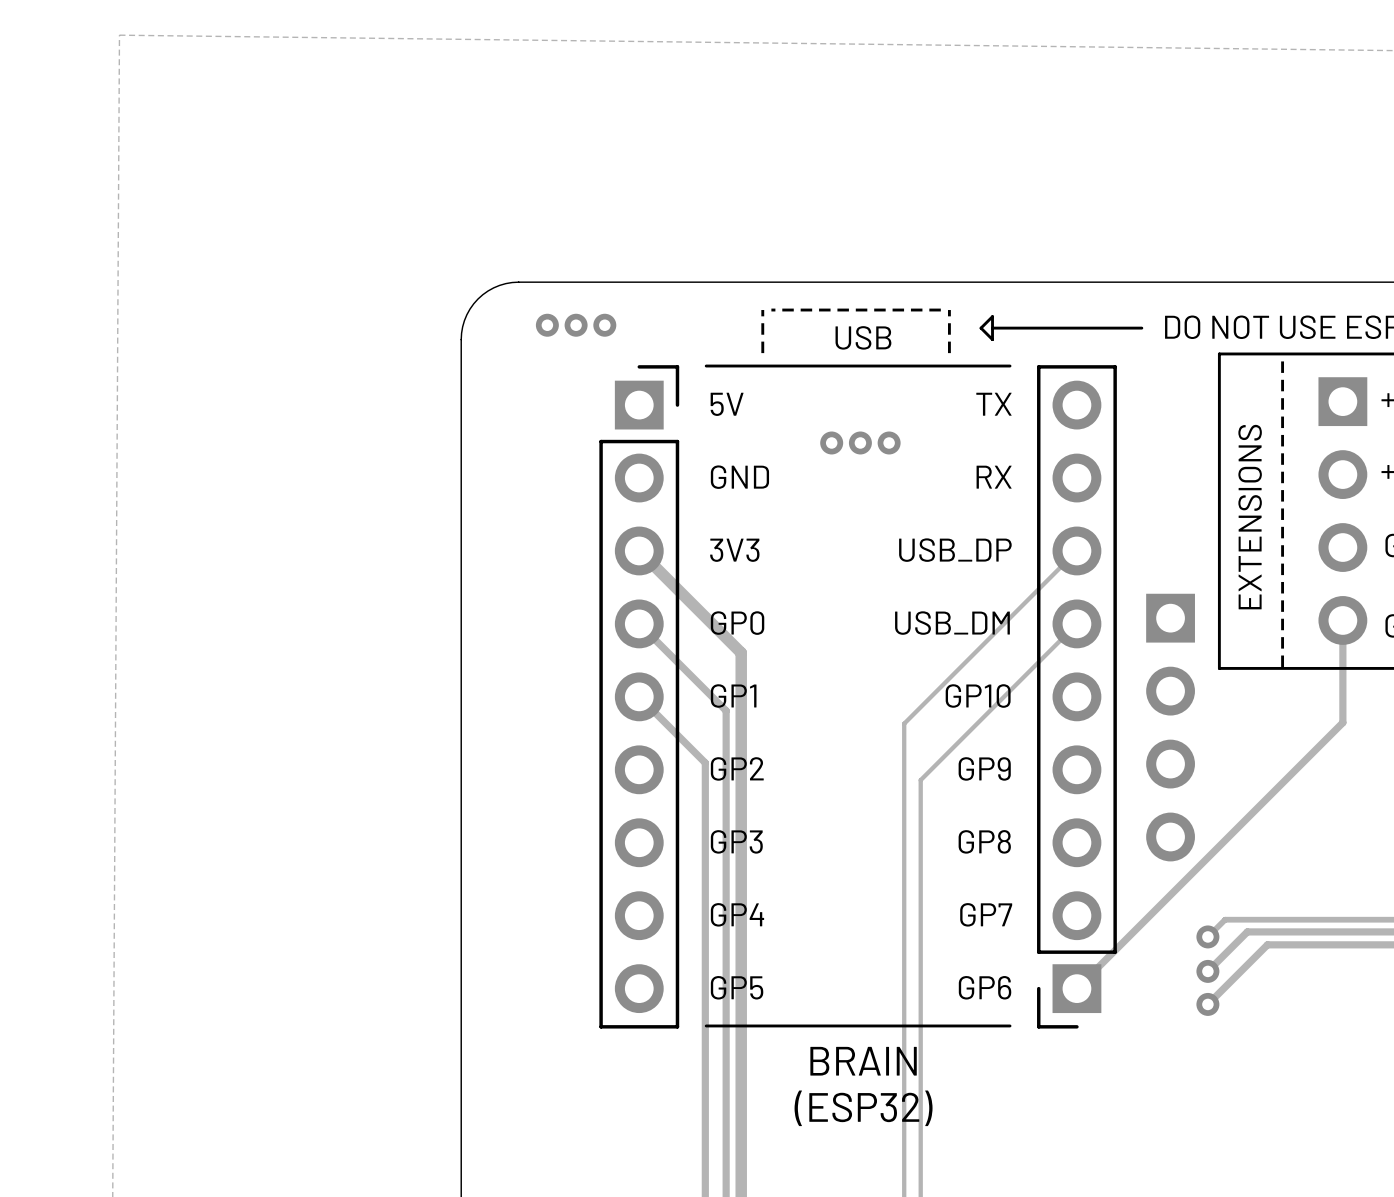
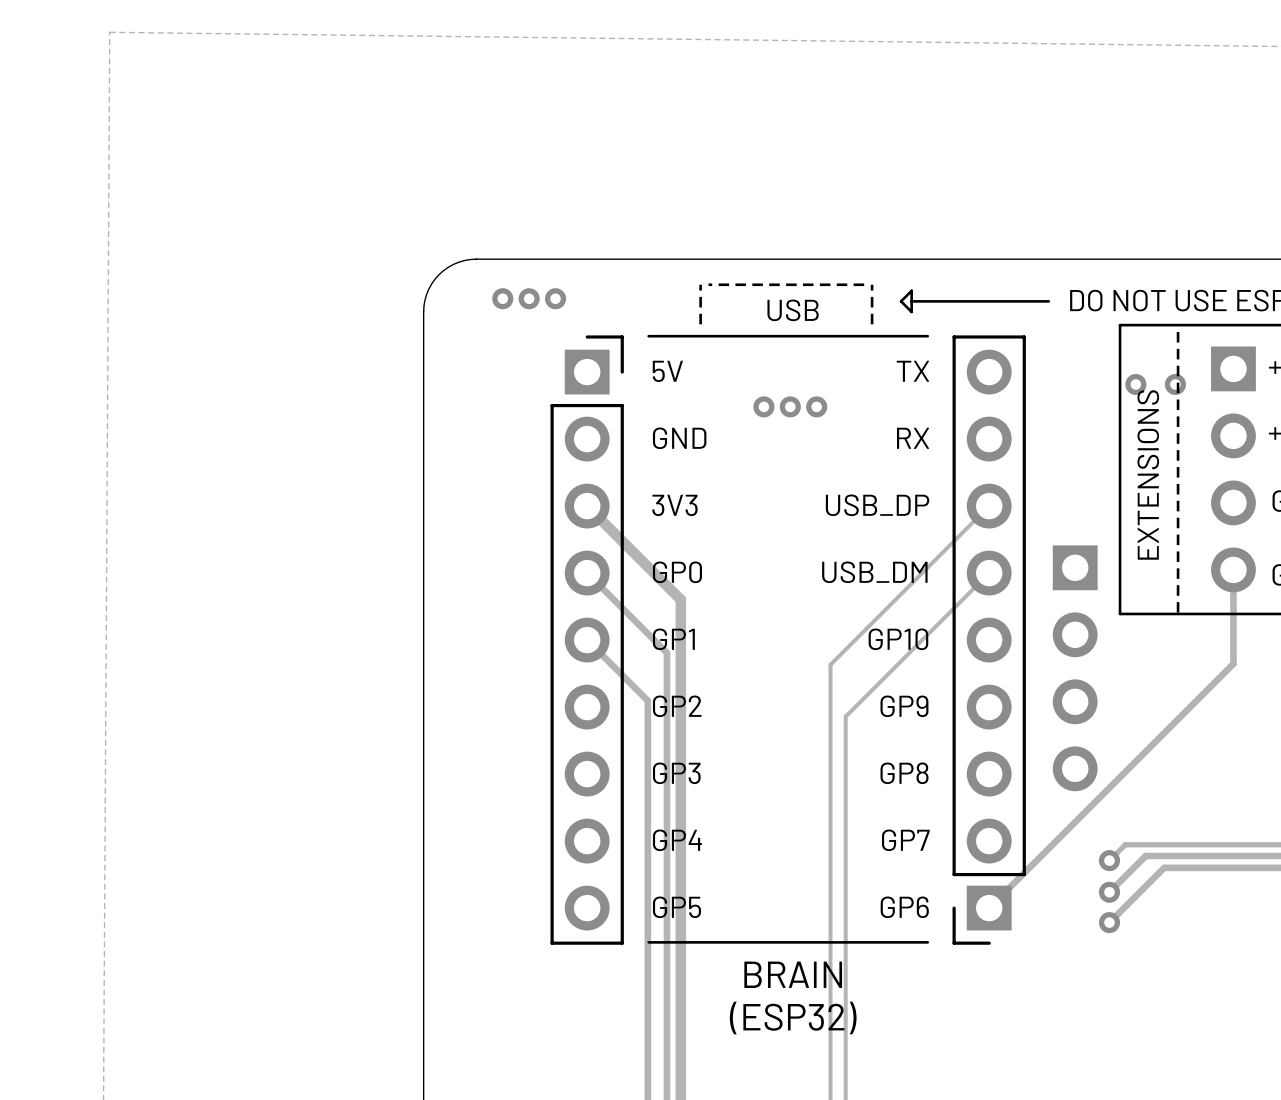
via: none -> (1135, 384)
via: none -> (1175, 384)

